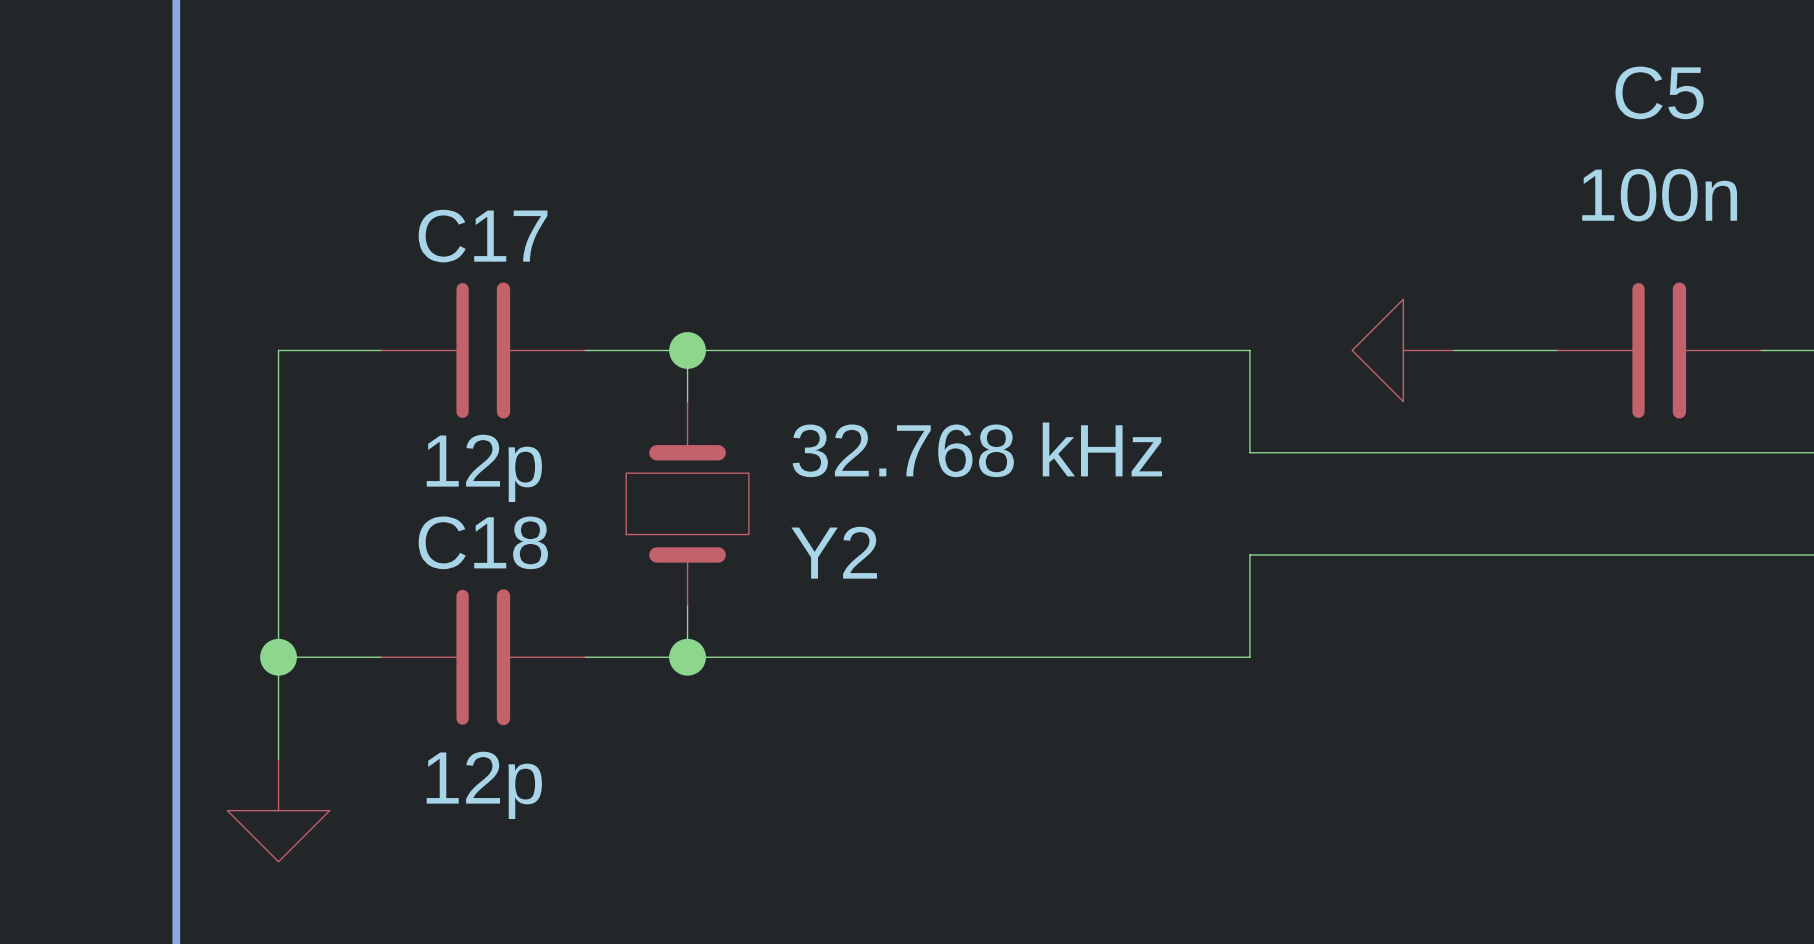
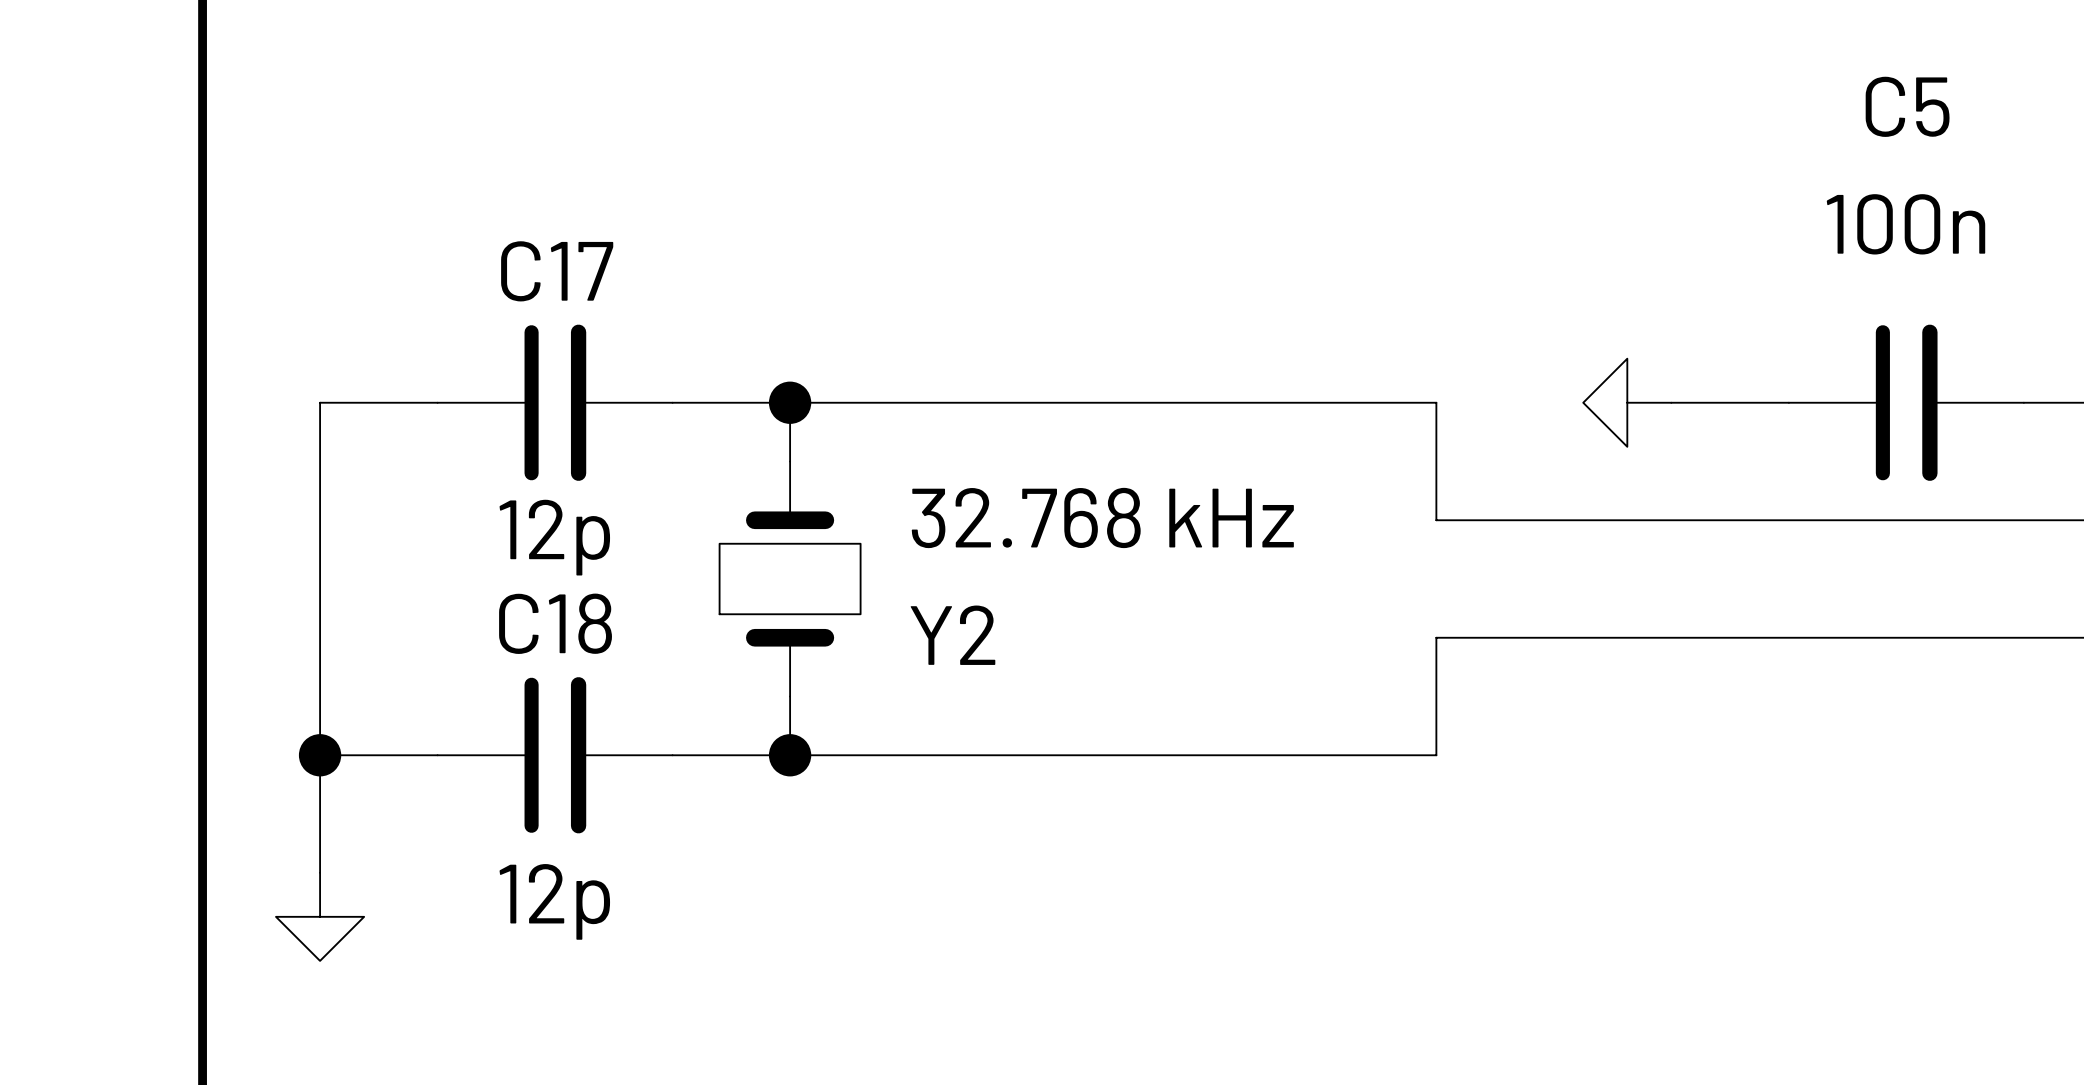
power symbol shape: [1352, 299, 1455, 402] -> [1583, 358, 1672, 447]
power symbol shape: [227, 759, 330, 862] -> [276, 872, 365, 961]

